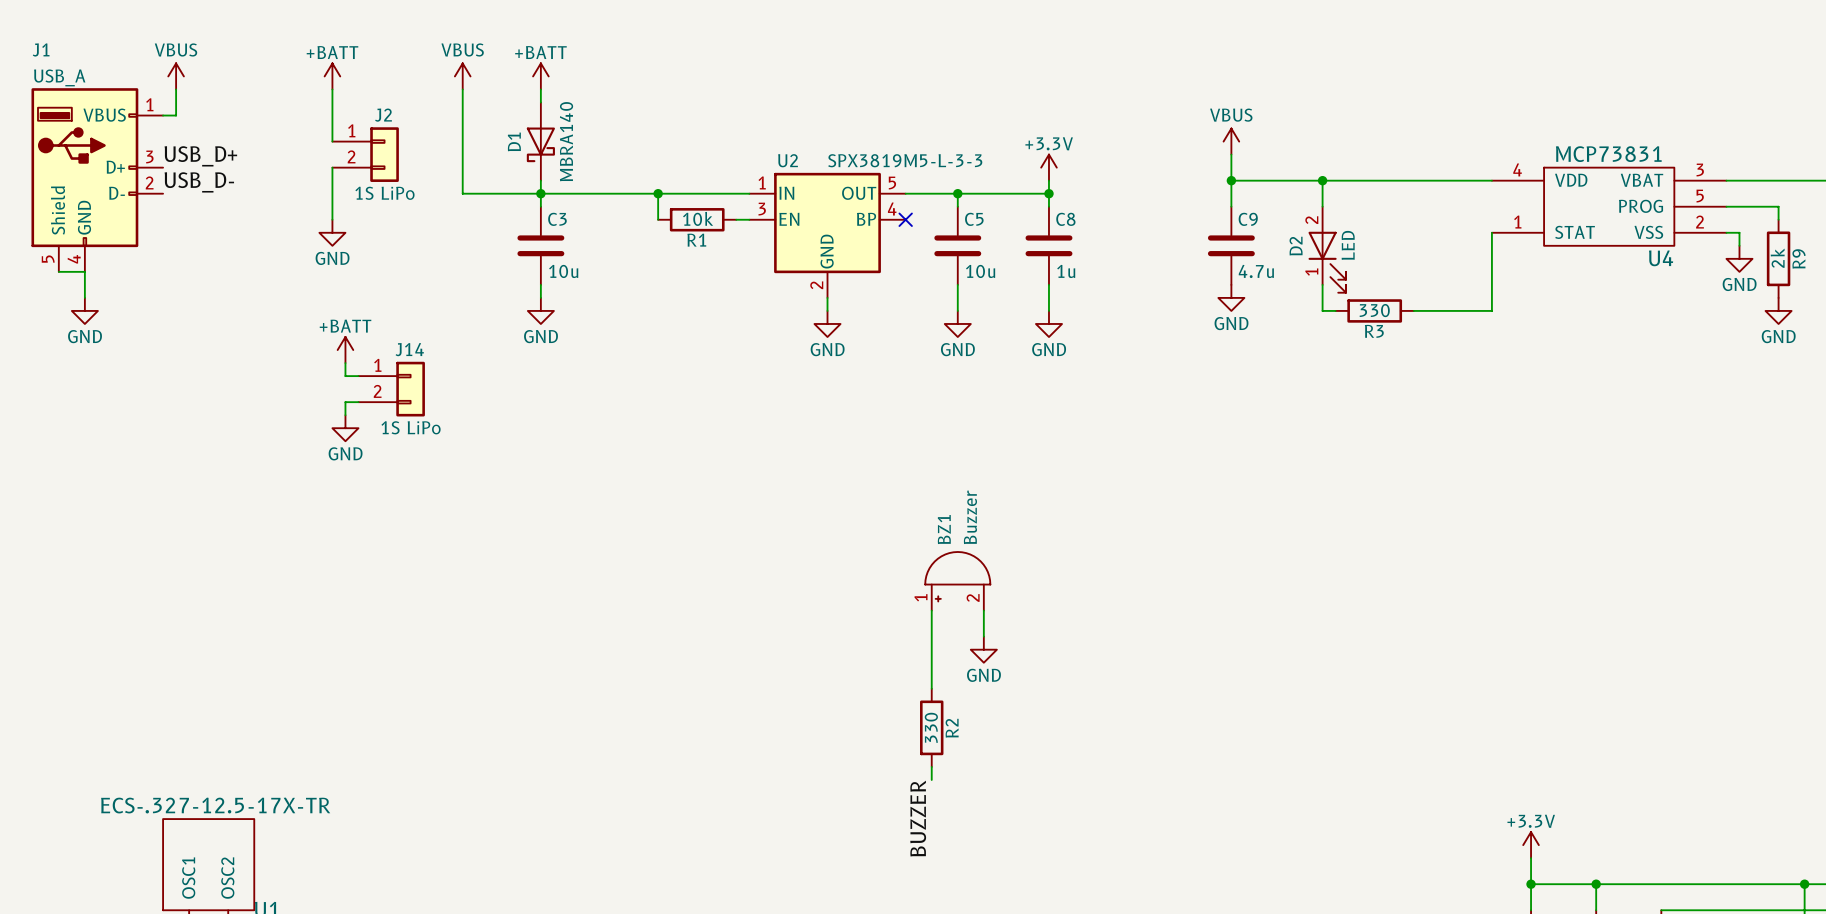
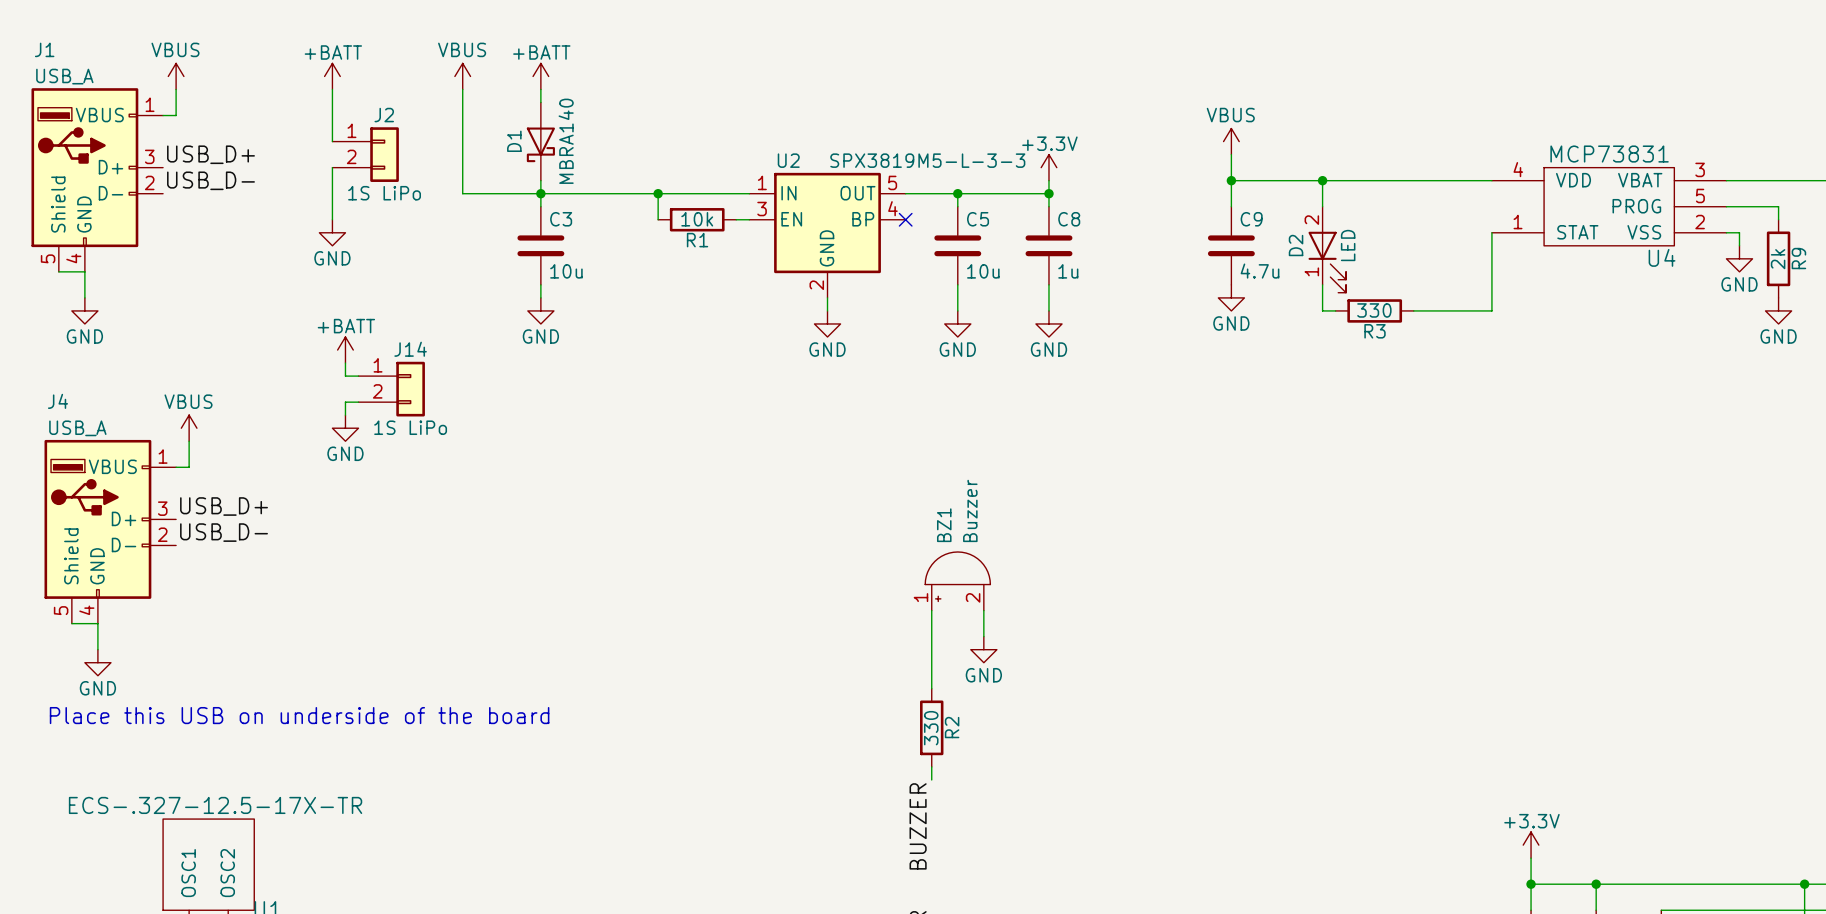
power symbol: none -> VBUS (189, 428)
wire: none -> (189, 441) (189, 467) (176, 467)
label: none -> USB_D+ (224, 506)
J4: none -> USB_A (110, 531)
label: none -> USB_D- (224, 532)
wire: none -> (71, 623) (97, 623) (97, 649)
power symbol: none -> GND (97, 662)
text: none -> Place this USB on underside of the board (299, 715)

